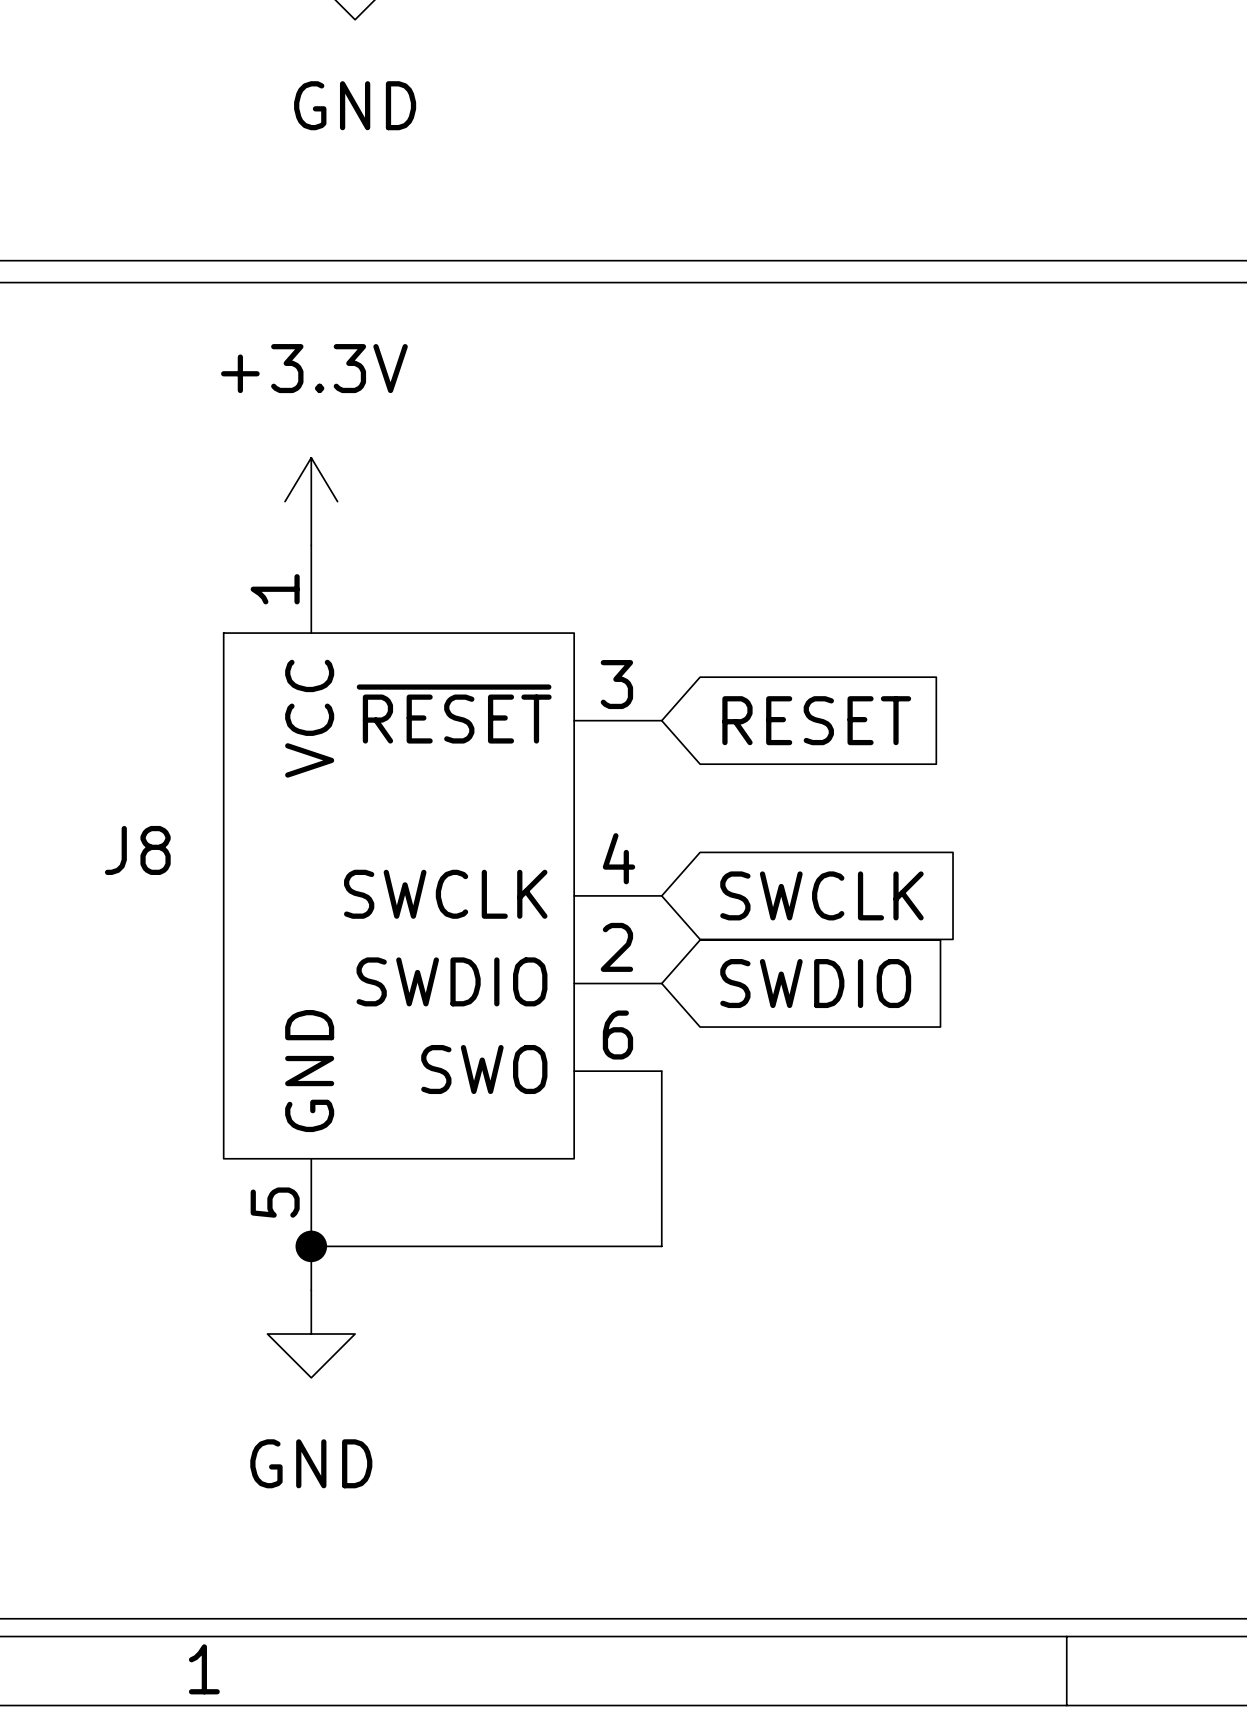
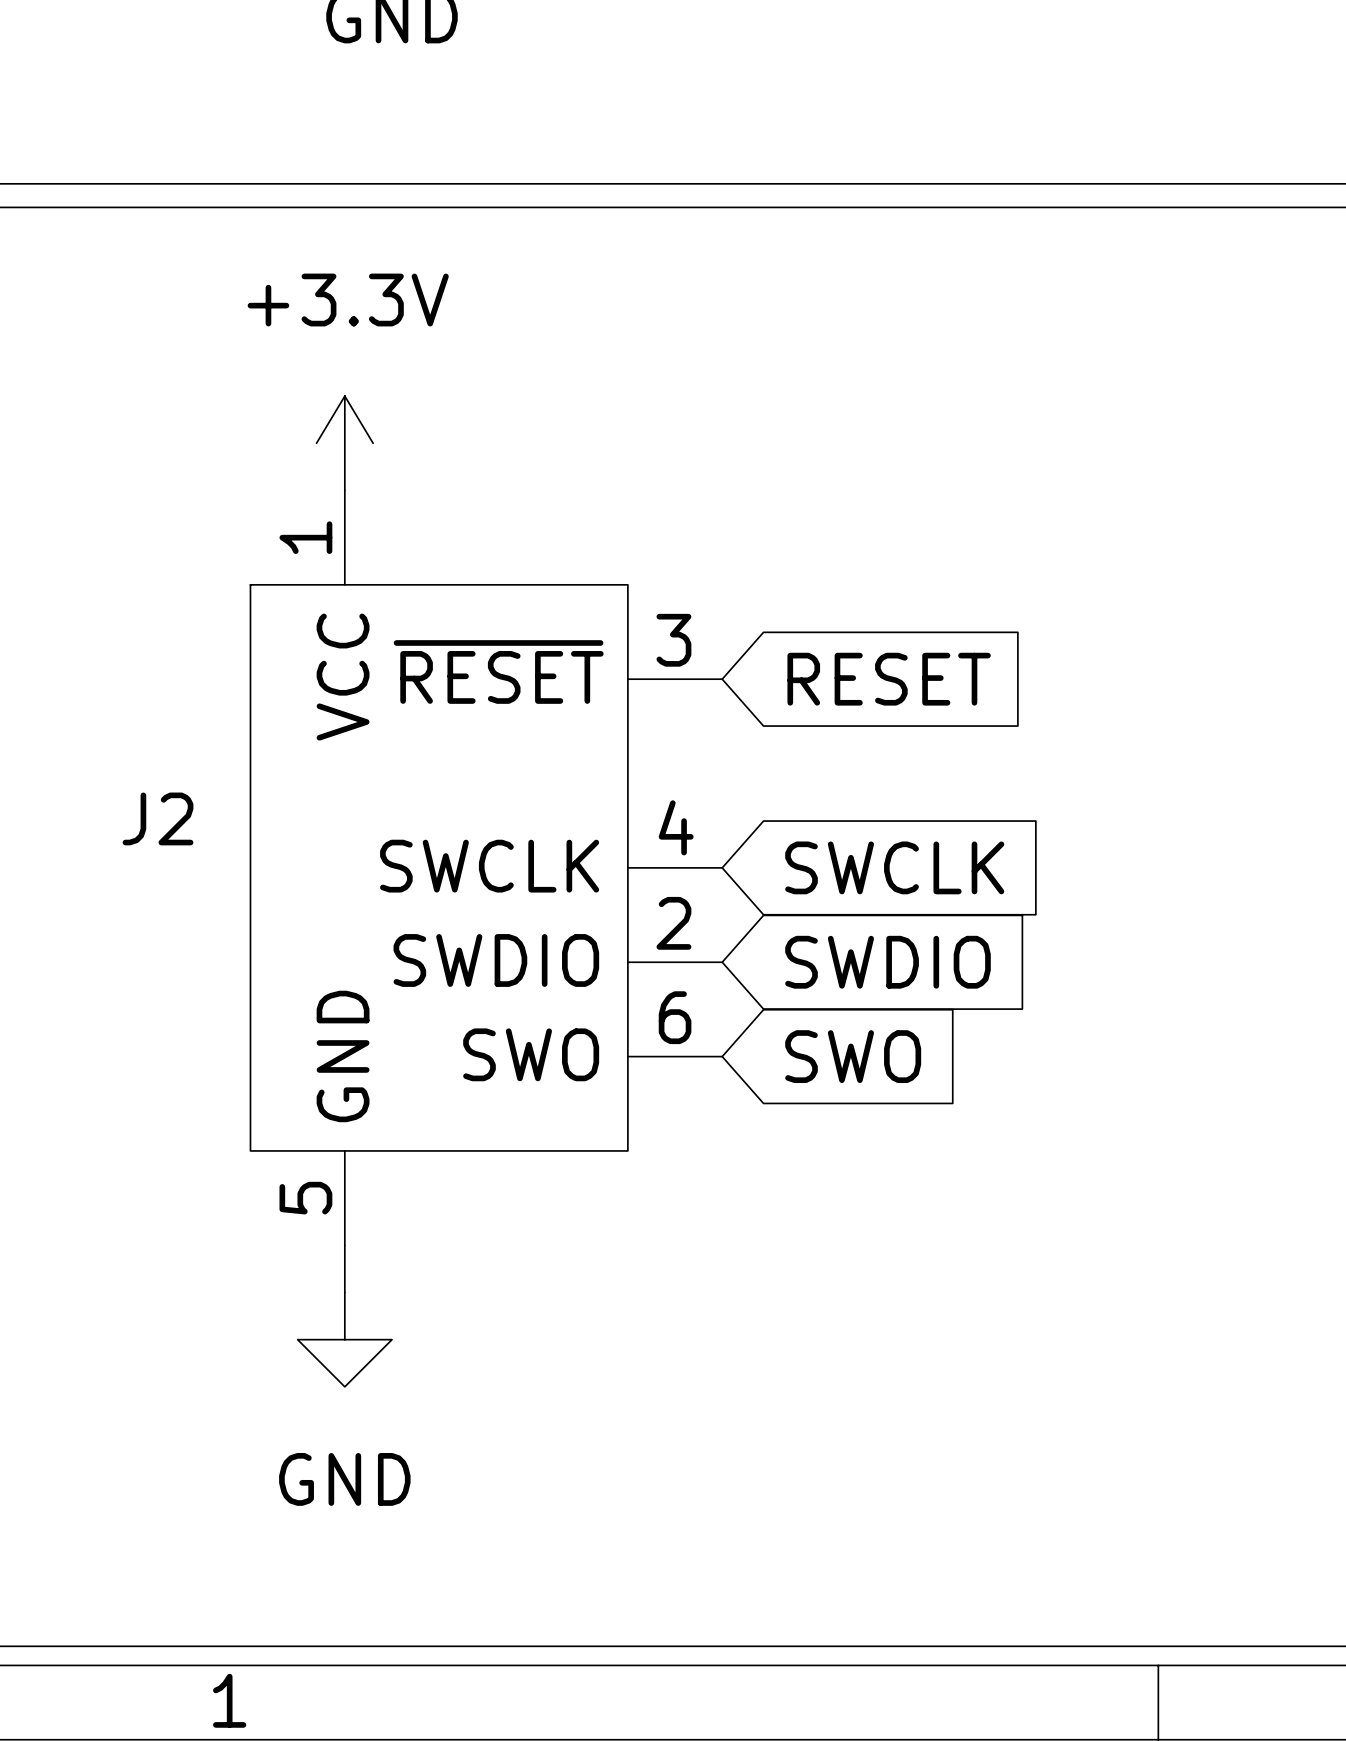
J8 name: J8 (137, 850) -> J2 (158, 818)
wire: (661, 1071) (661, 1246) (311, 1246) -> none
global label: none -> SWO (853, 1056)
junction: (311, 1246) -> none

